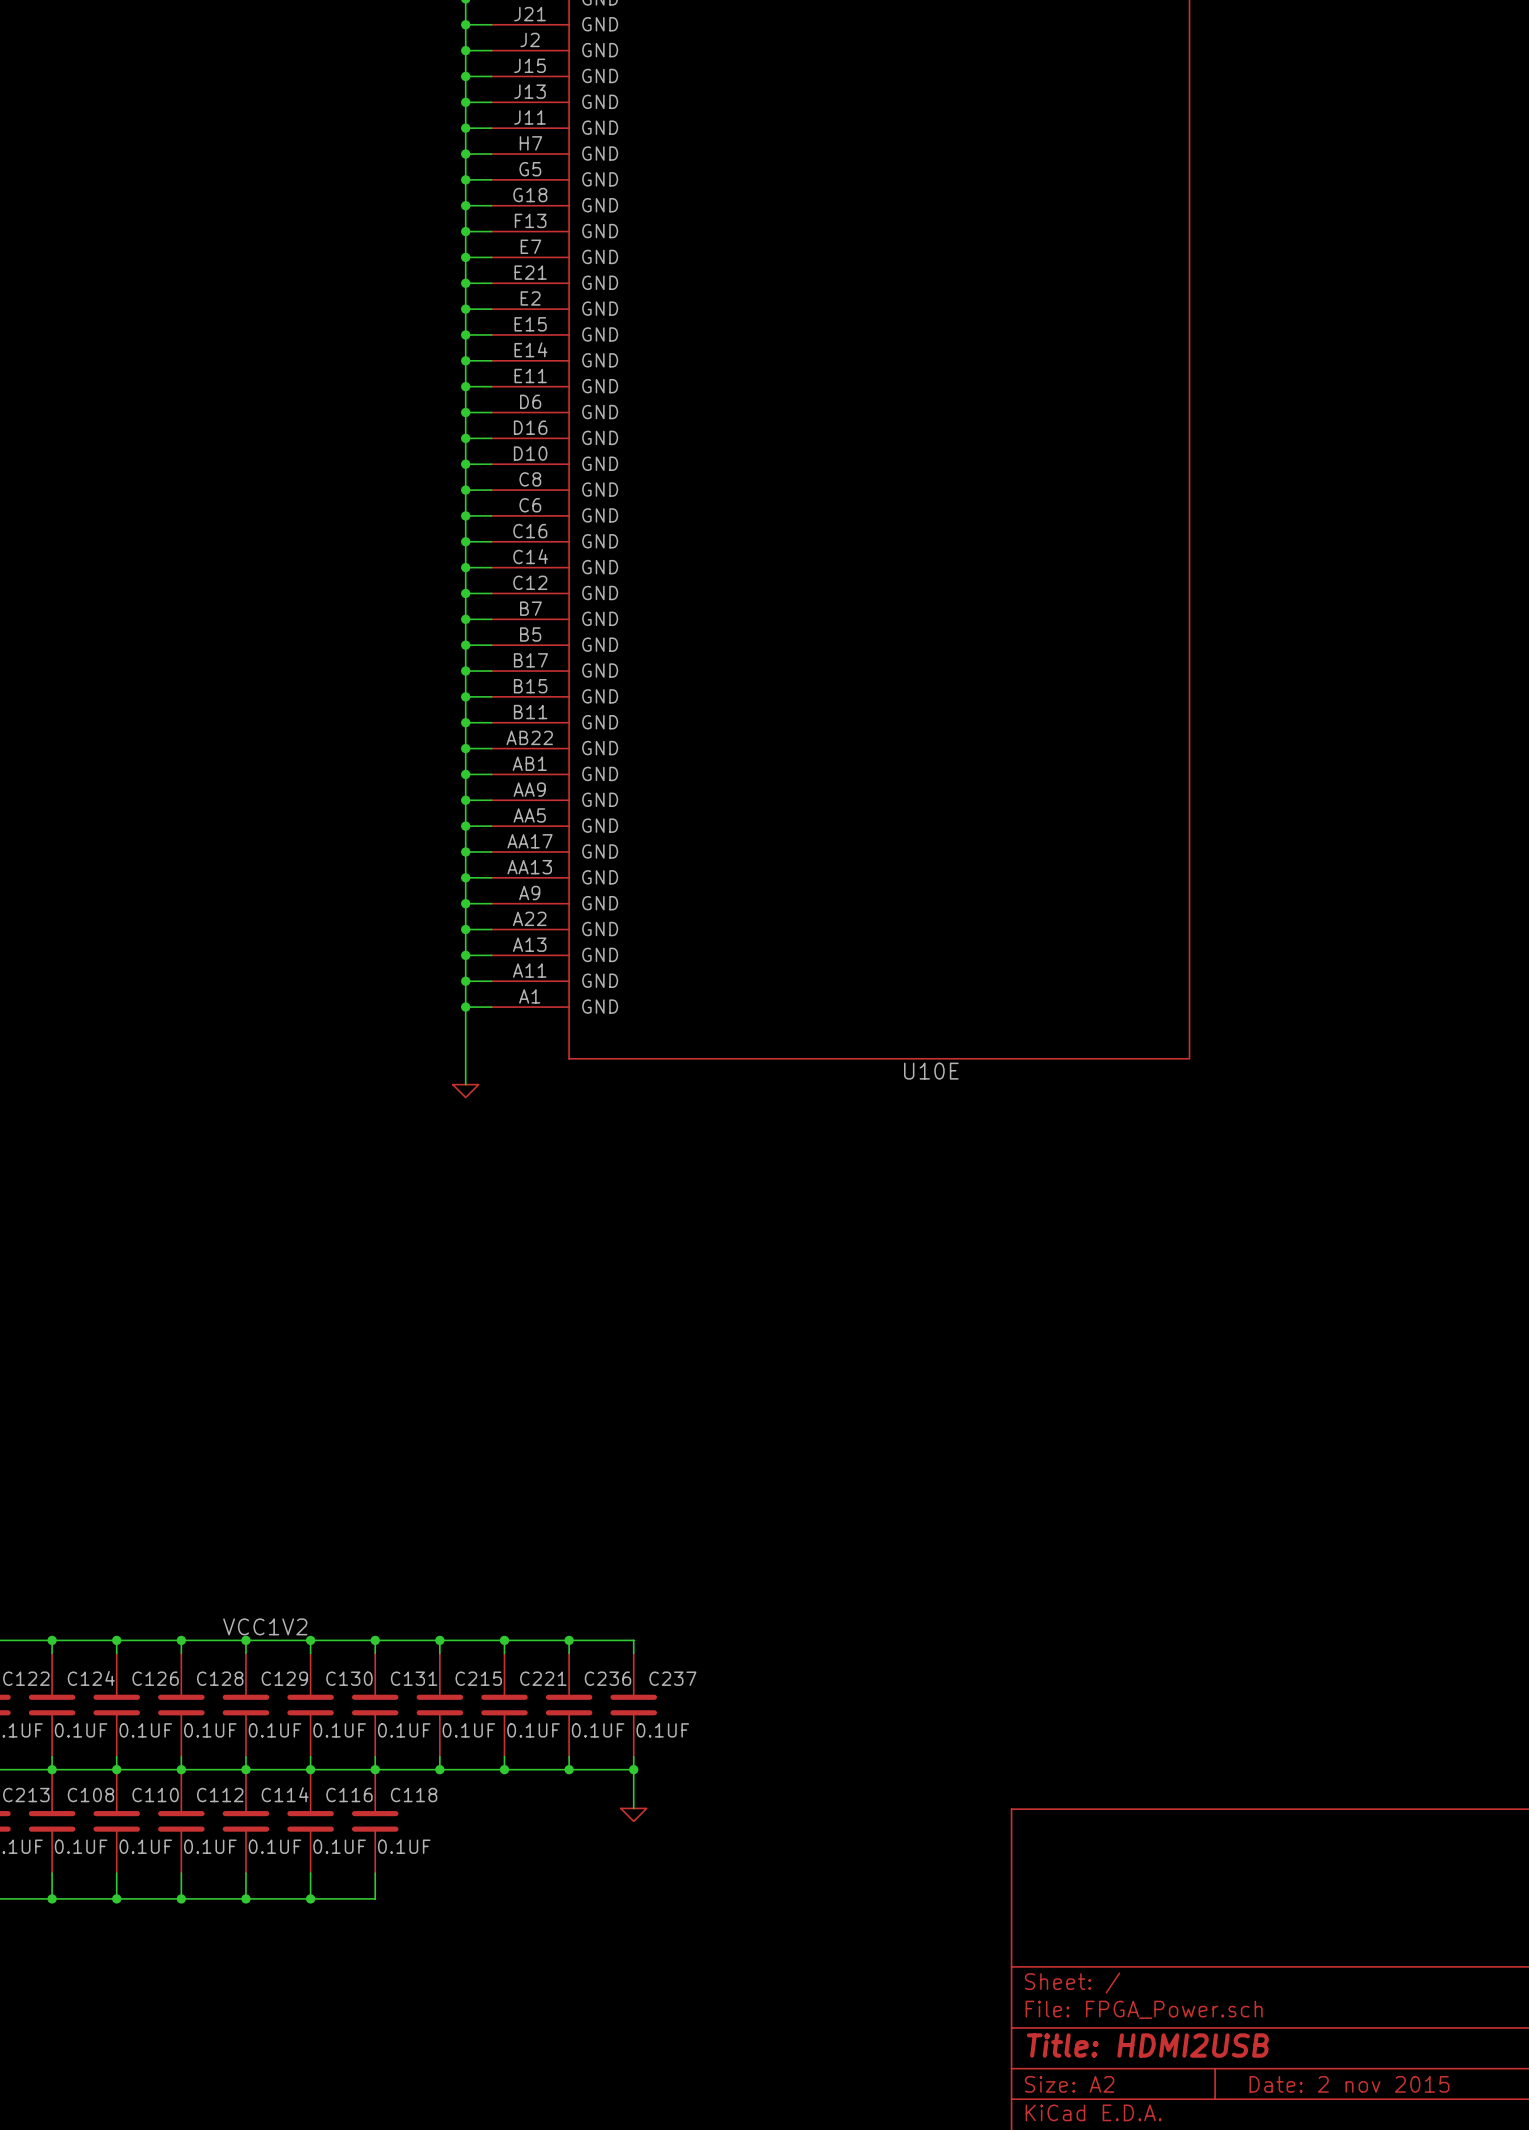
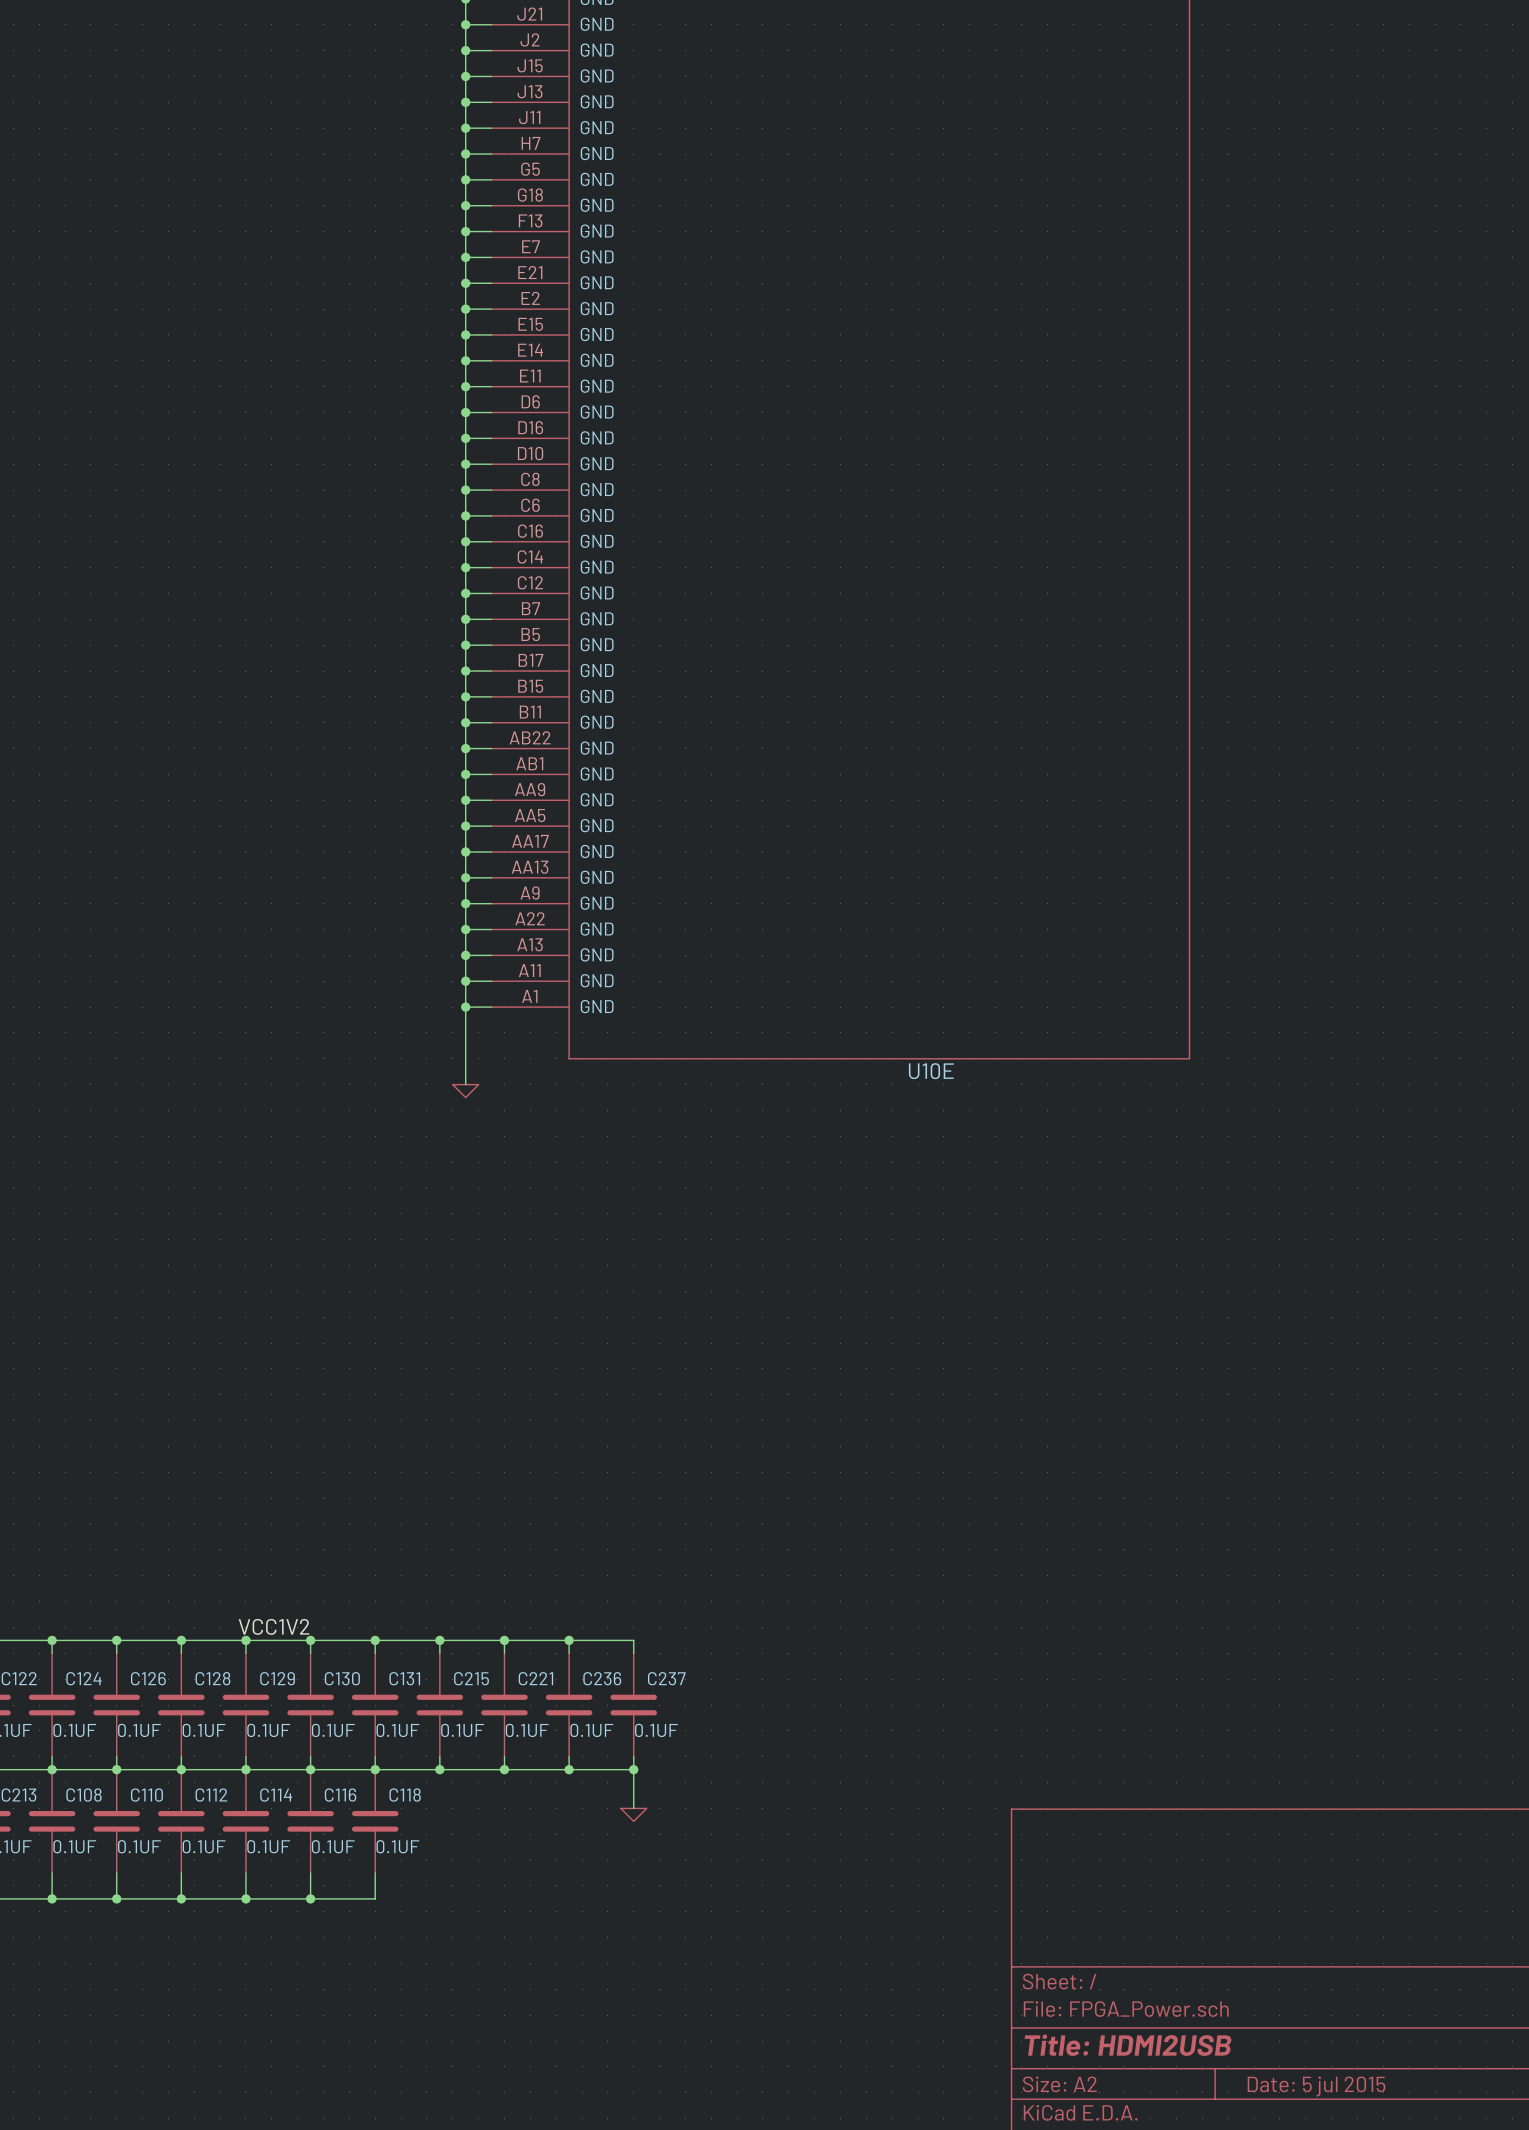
title block: Date: 2 nov 2015 (1349, 2084) -> Date: 5 jul 2015 (1316, 2086)

